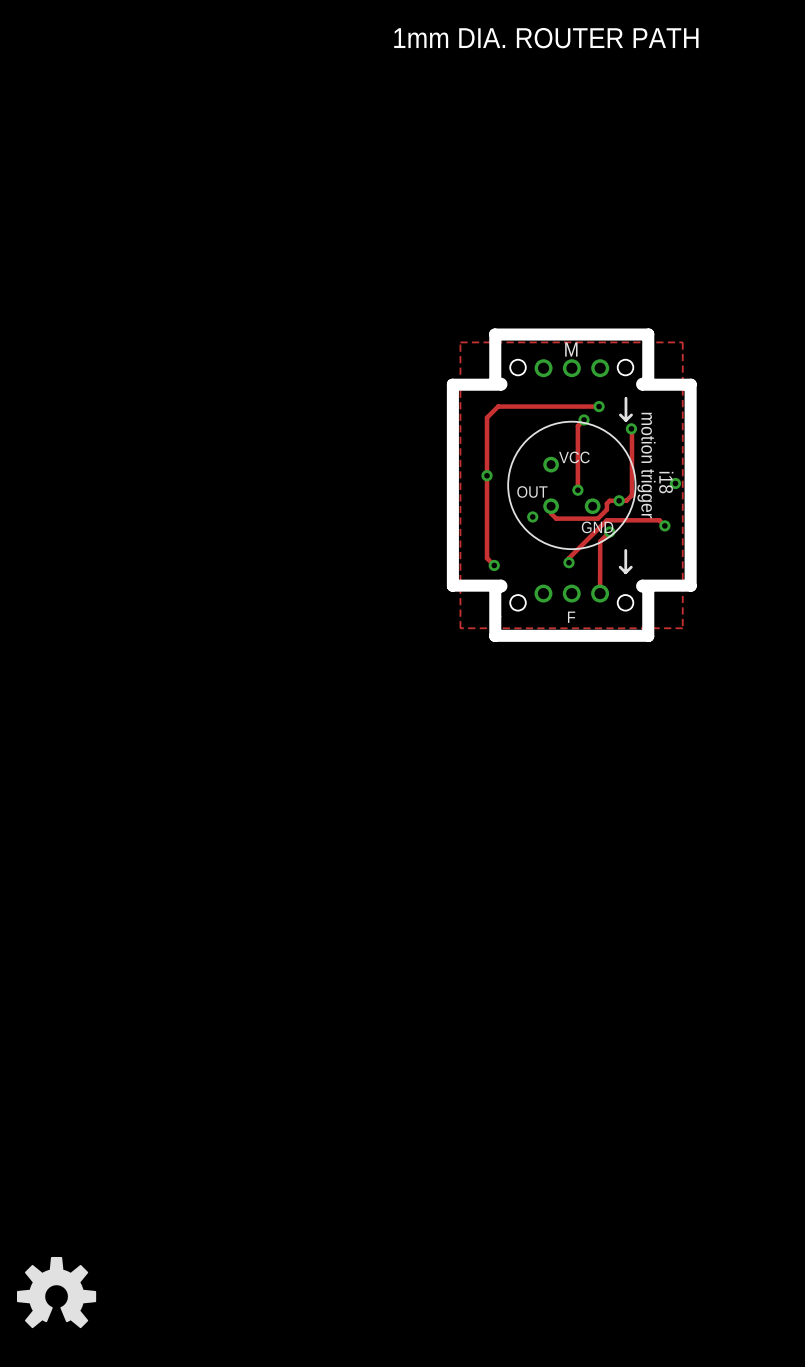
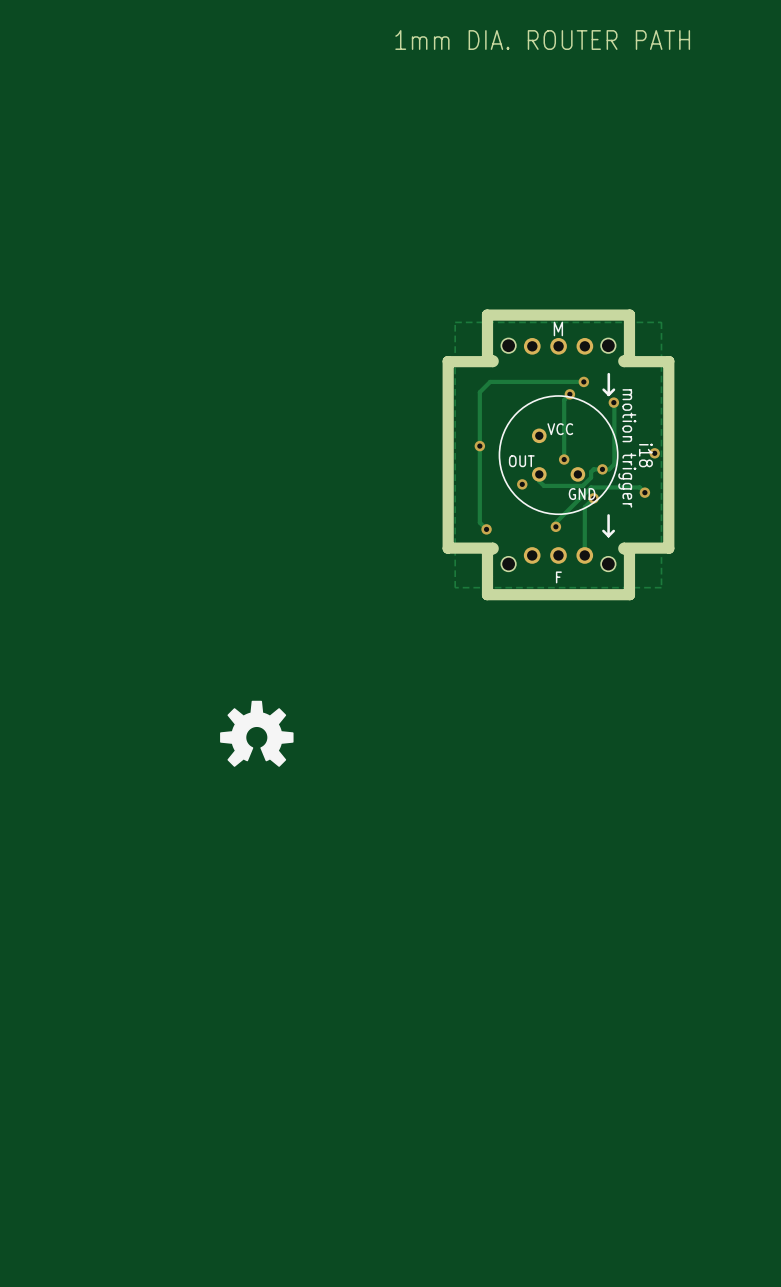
drawing: none -> [220, 700, 294, 767]
drawing: [16, 1256, 97, 1329] -> none

